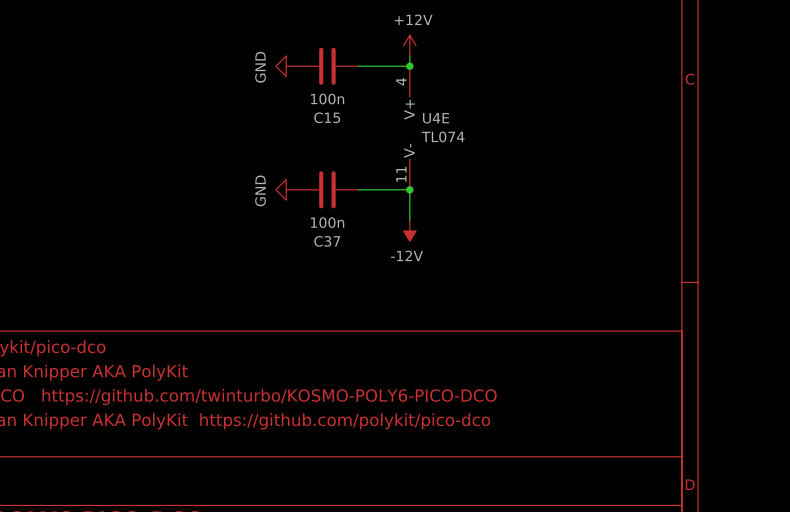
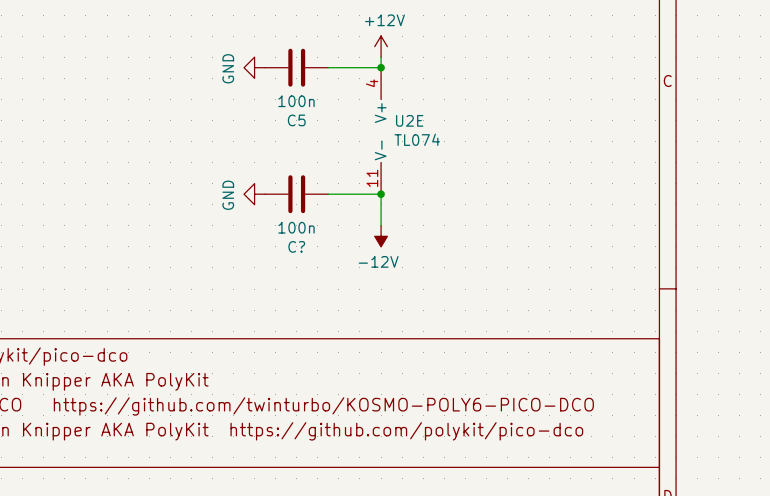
C15 name: C15 (327, 117) -> C5 (296, 120)
U4E name: U4E (436, 118) -> U2E (409, 120)
C37 name: C37 (327, 241) -> C? (296, 246)

